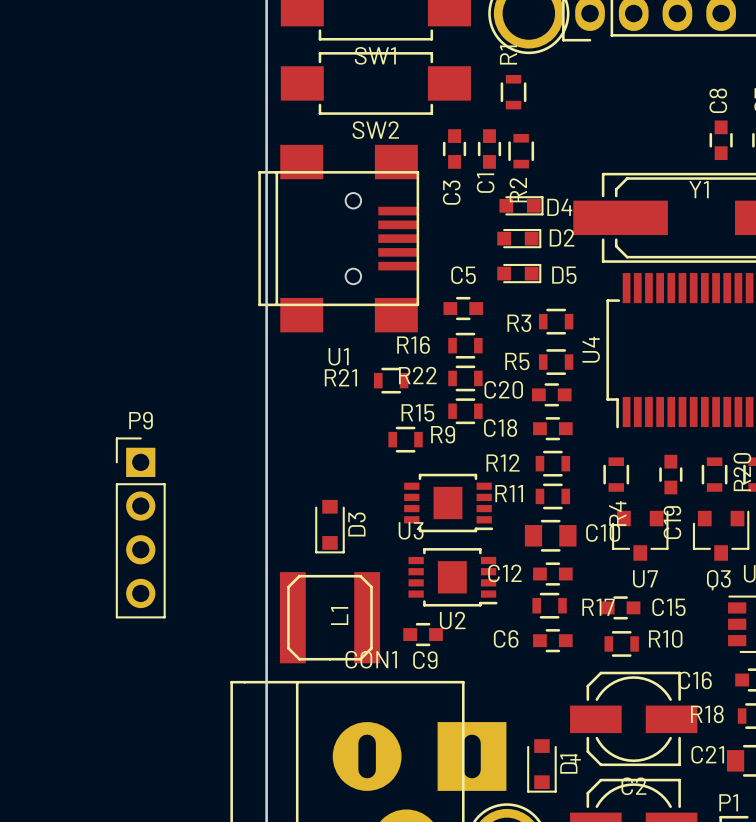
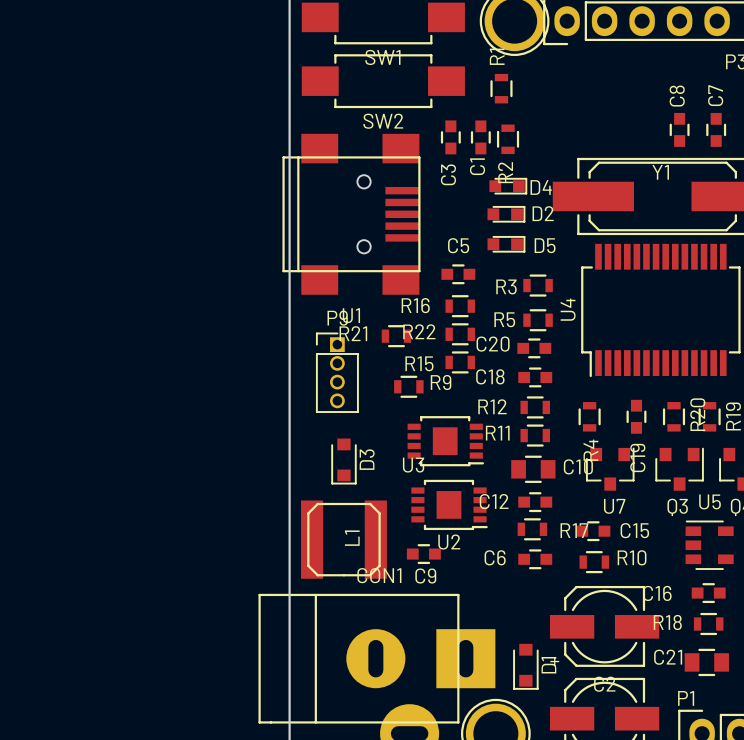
P9 name position: P9 (141, 420) -> P9 (337, 318)
P9 footprint: [115, 437, 166, 619] -> [316, 332, 359, 413]

